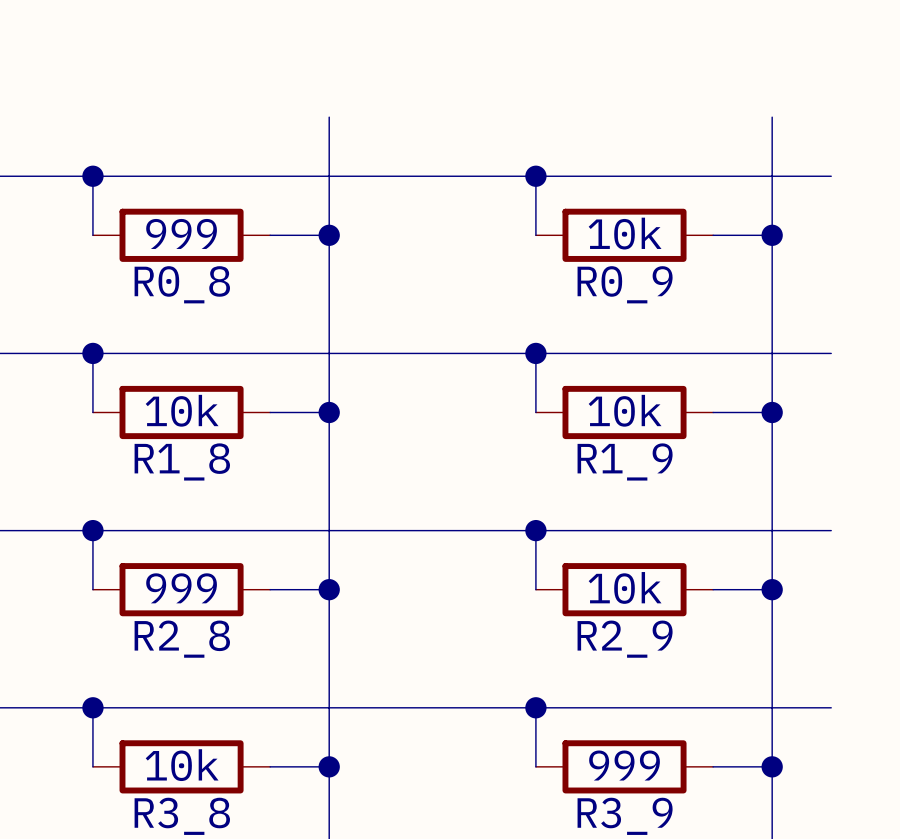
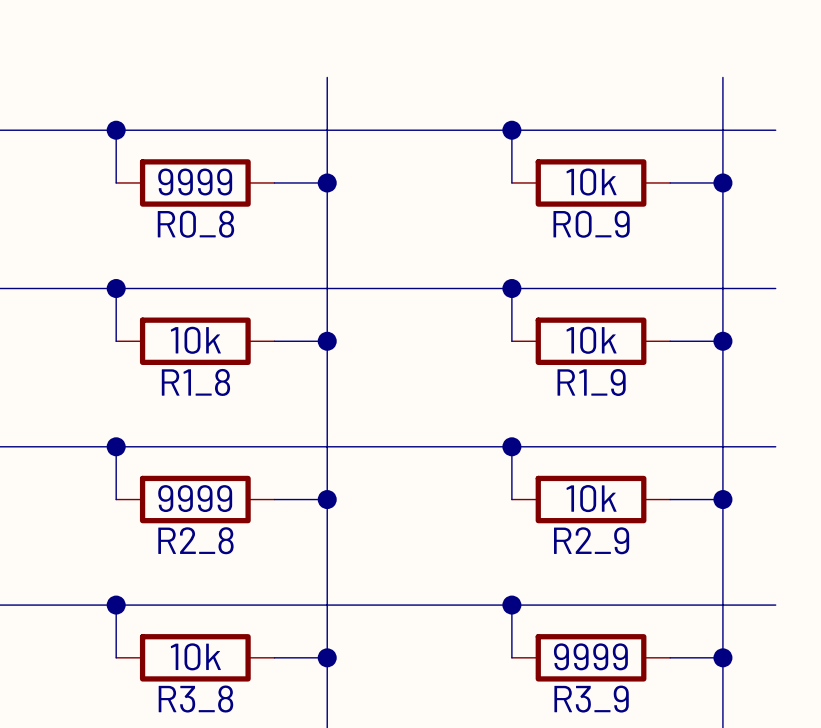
R0_8 value: 999 (181, 233) -> 9999 (195, 182)
R2_8 value: 999 (181, 588) -> 9999 (195, 498)
R3_9 value: 999 (624, 765) -> 9999 (590, 656)

